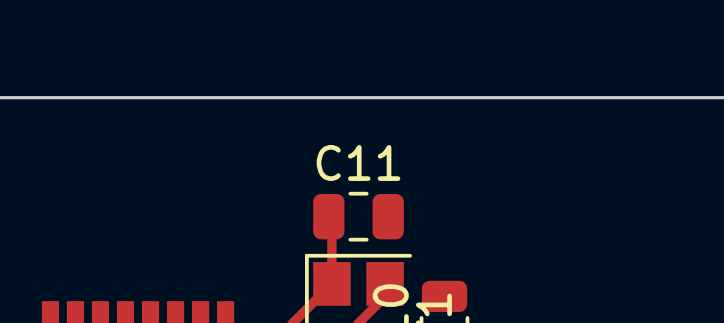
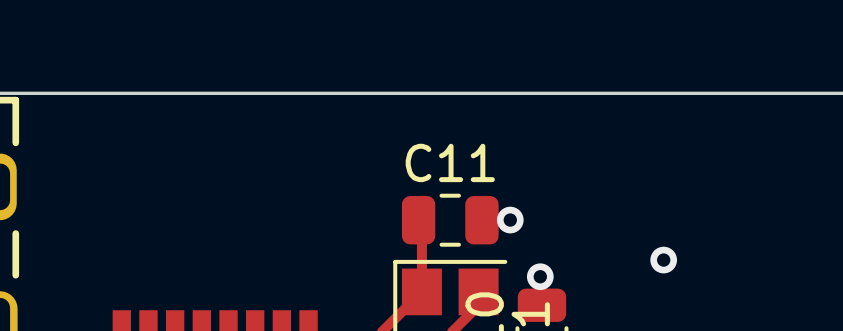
via: none -> (510, 220)
via: none -> (663, 260)
via: none -> (540, 276)

